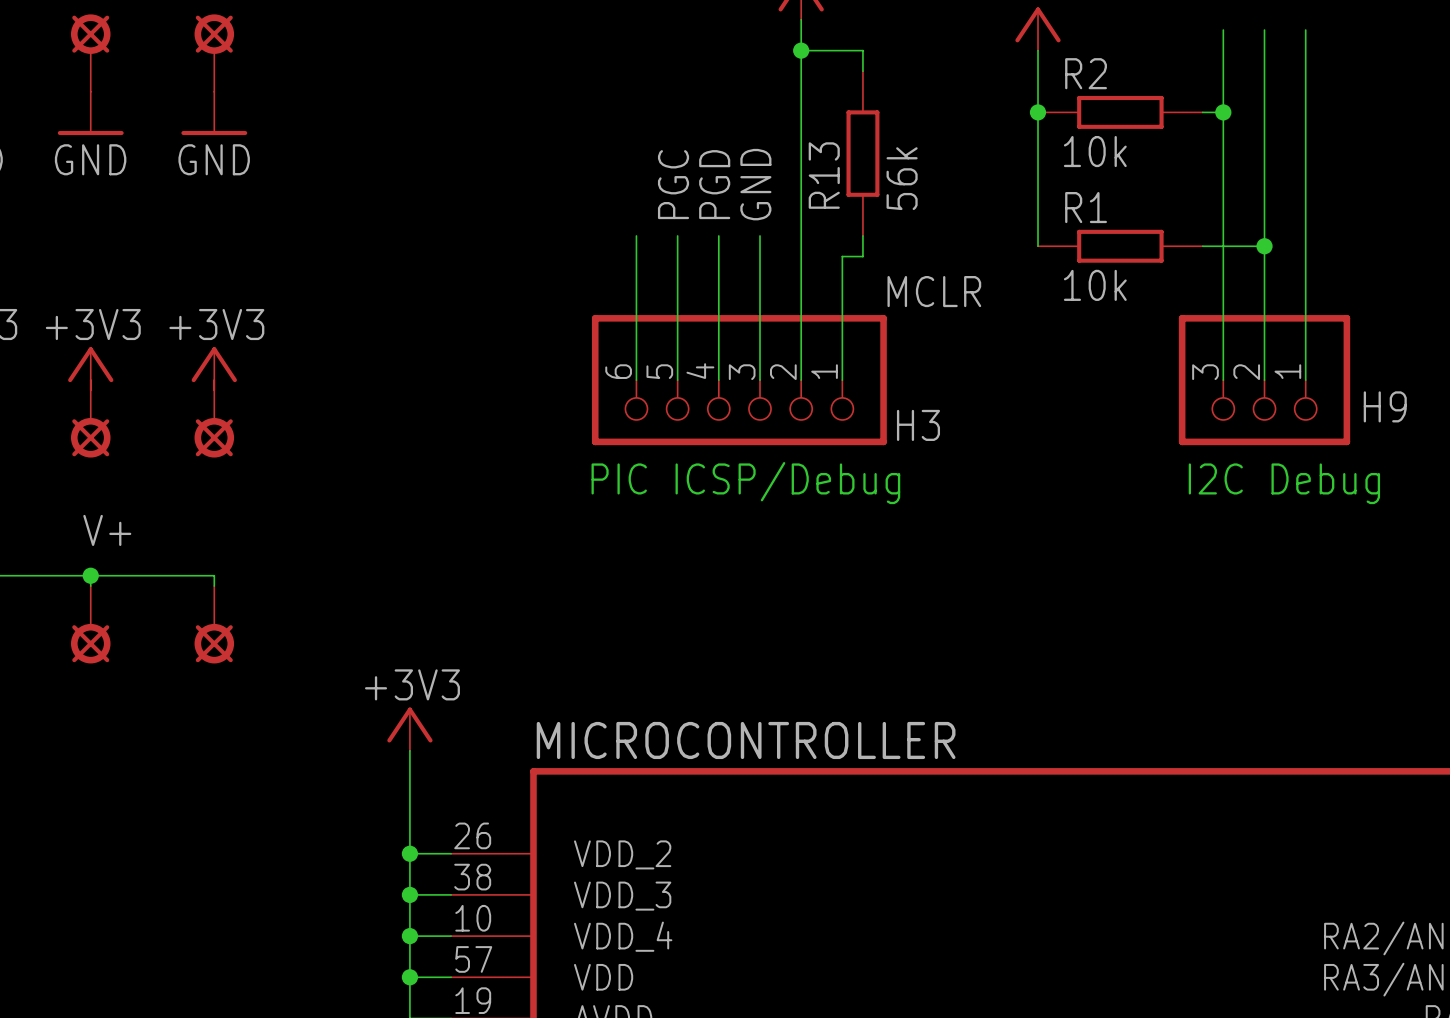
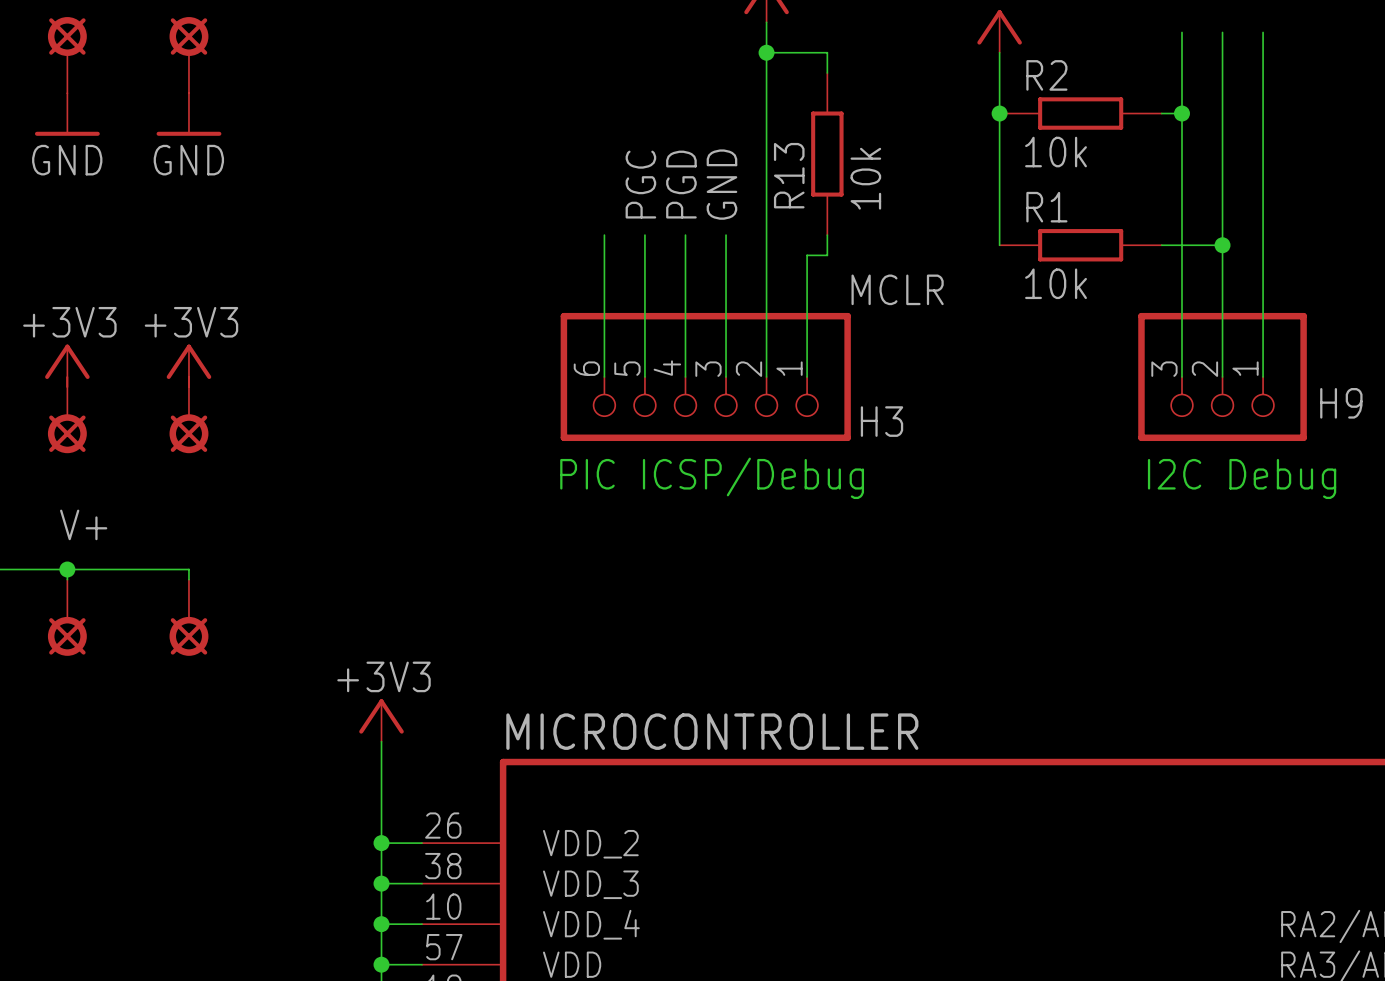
R13 value: 56k (902, 178) -> 10k (865, 178)

